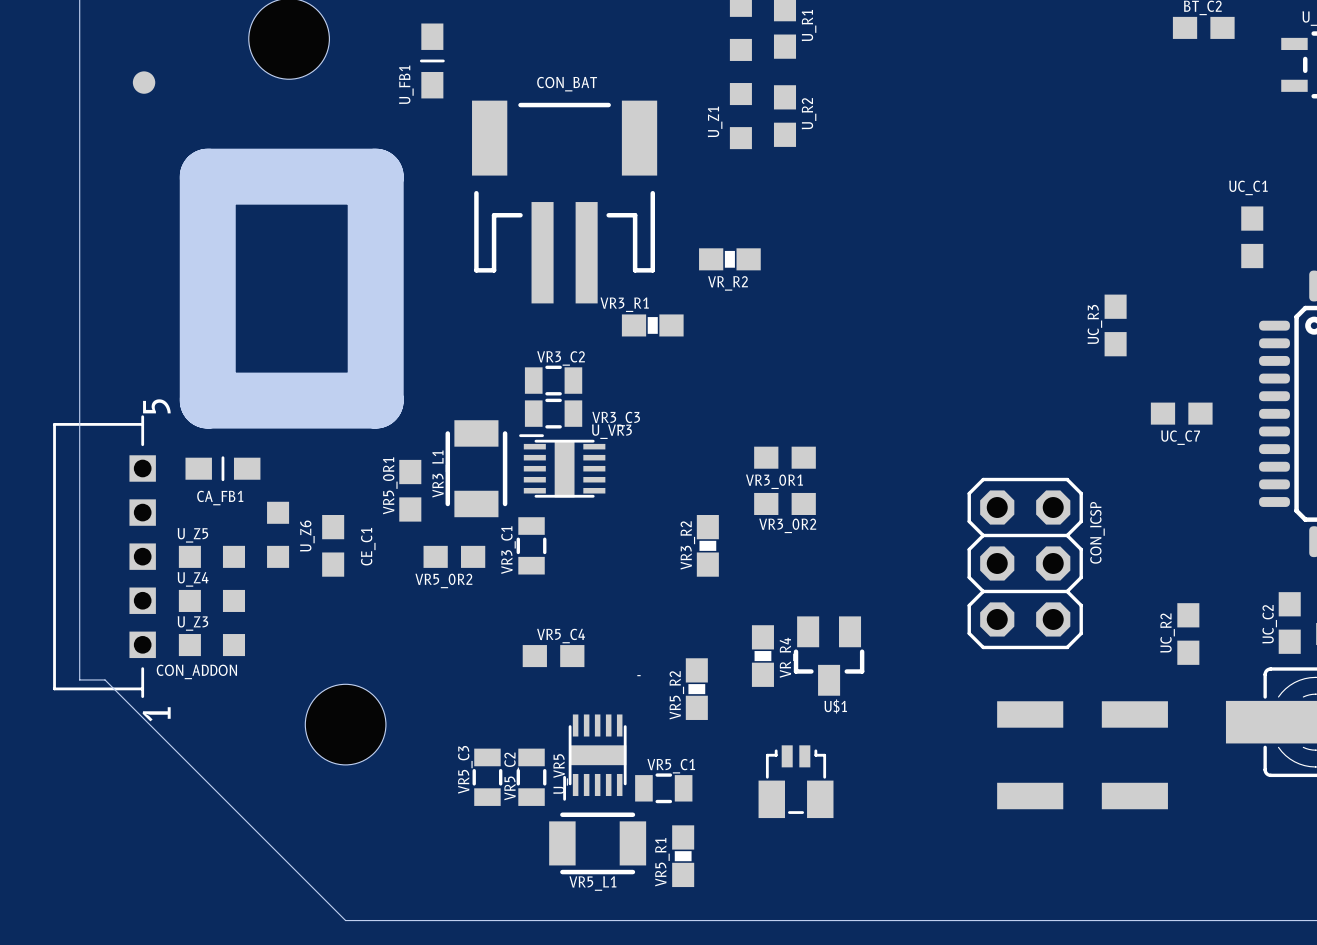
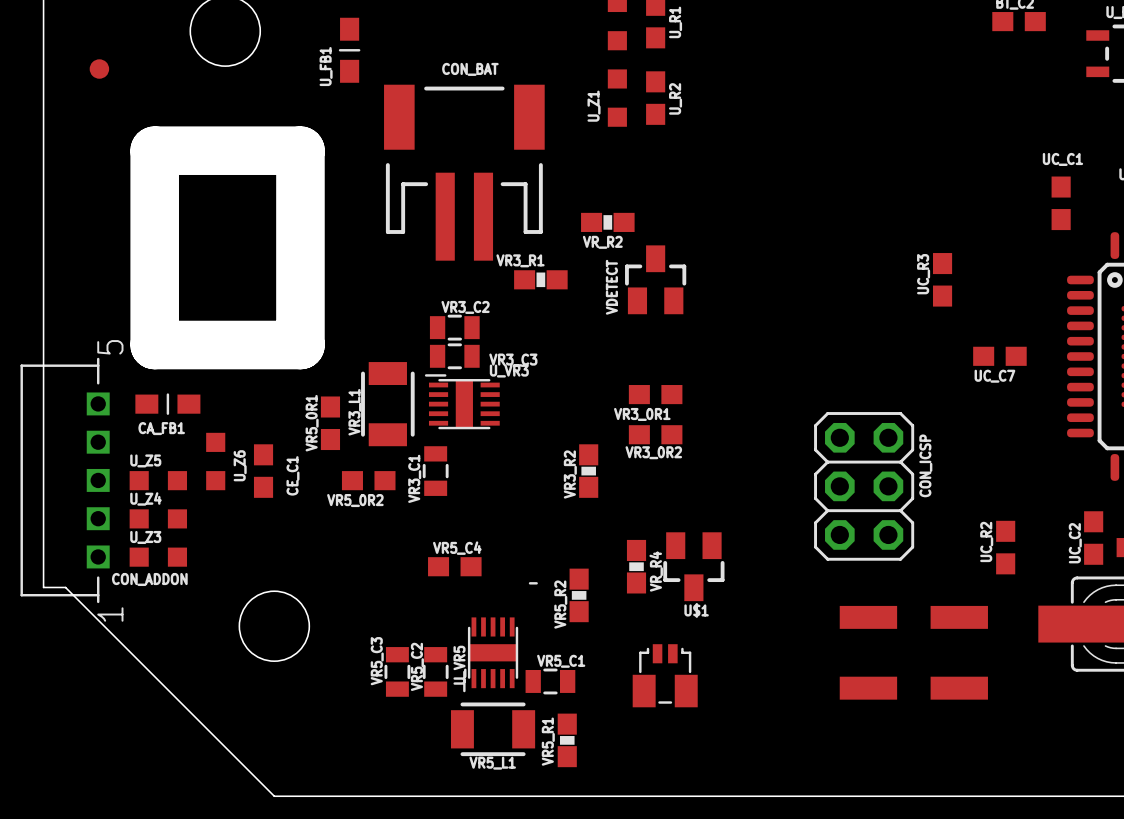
VDETECT: none -> (655, 279)

